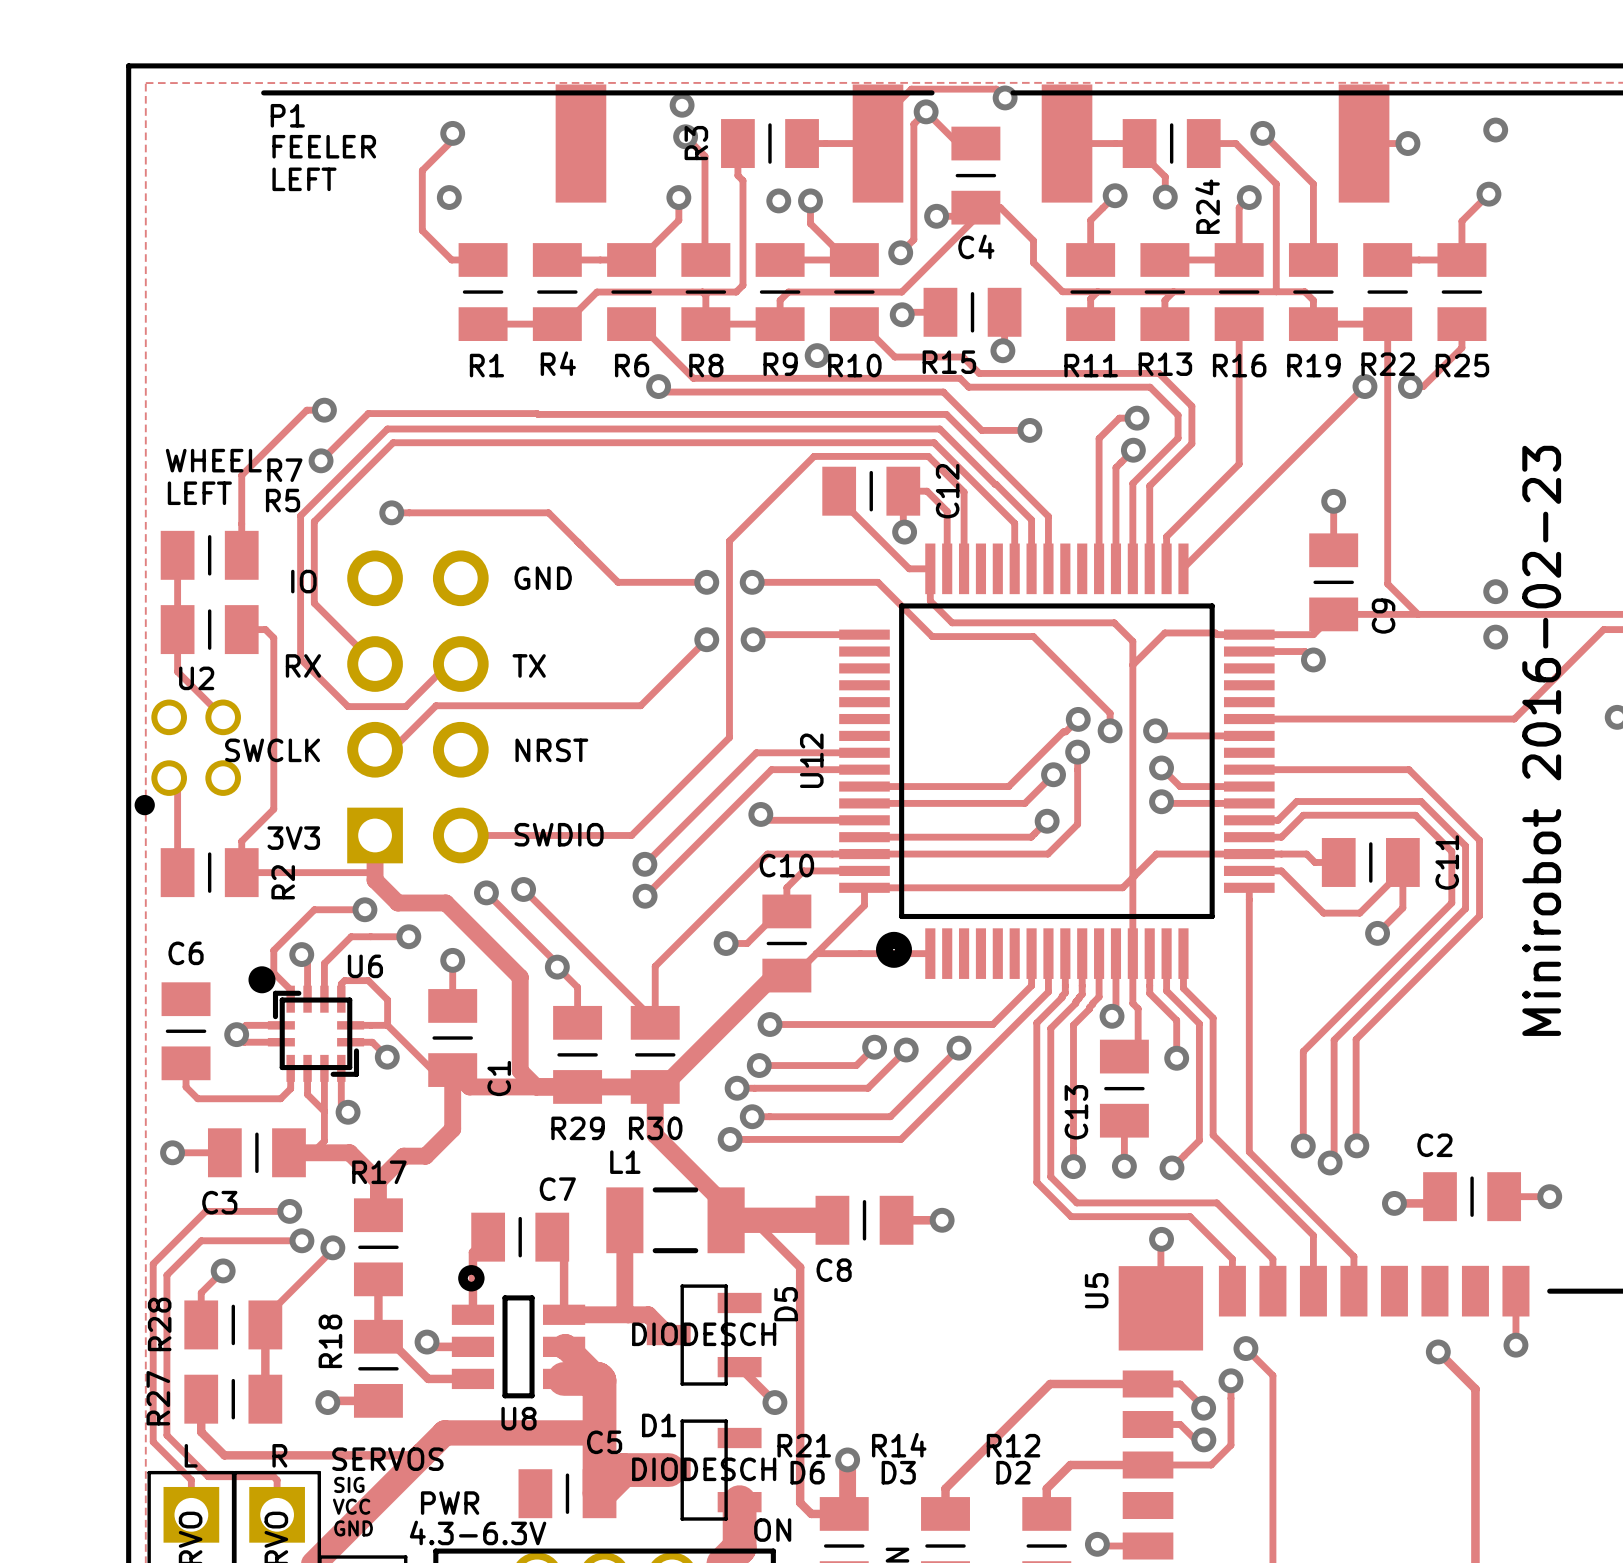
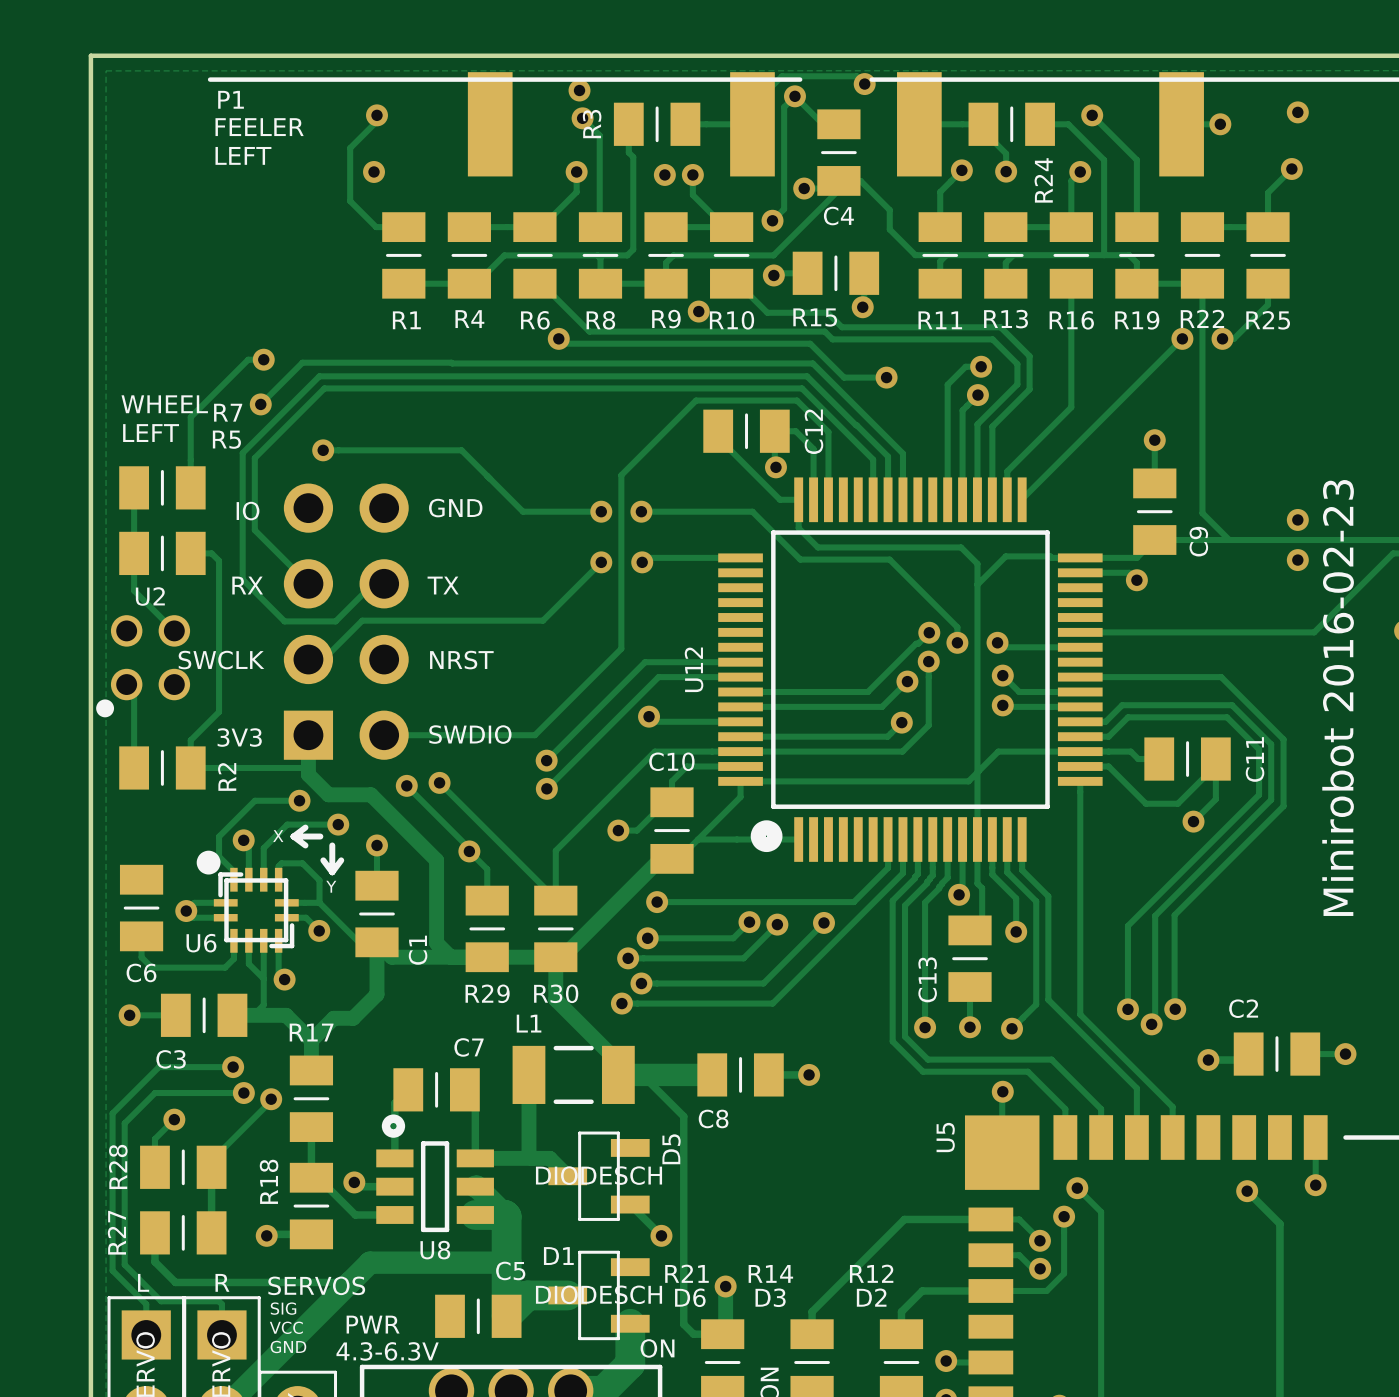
line: none -> (305, 827) (293, 836)
text: none -> X (278, 836)
line: none -> (293, 836) (305, 845)
line: none -> (293, 836) (320, 836)
C6 name position: C6 (186, 953) -> C6 (141, 972)
line: none -> (332, 845) (332, 872)
U6 name position: U6 (365, 966) -> U6 (201, 943)
line: none -> (323, 860) (332, 872)
line: none -> (341, 860) (332, 872)
text: none -> Y (331, 886)

